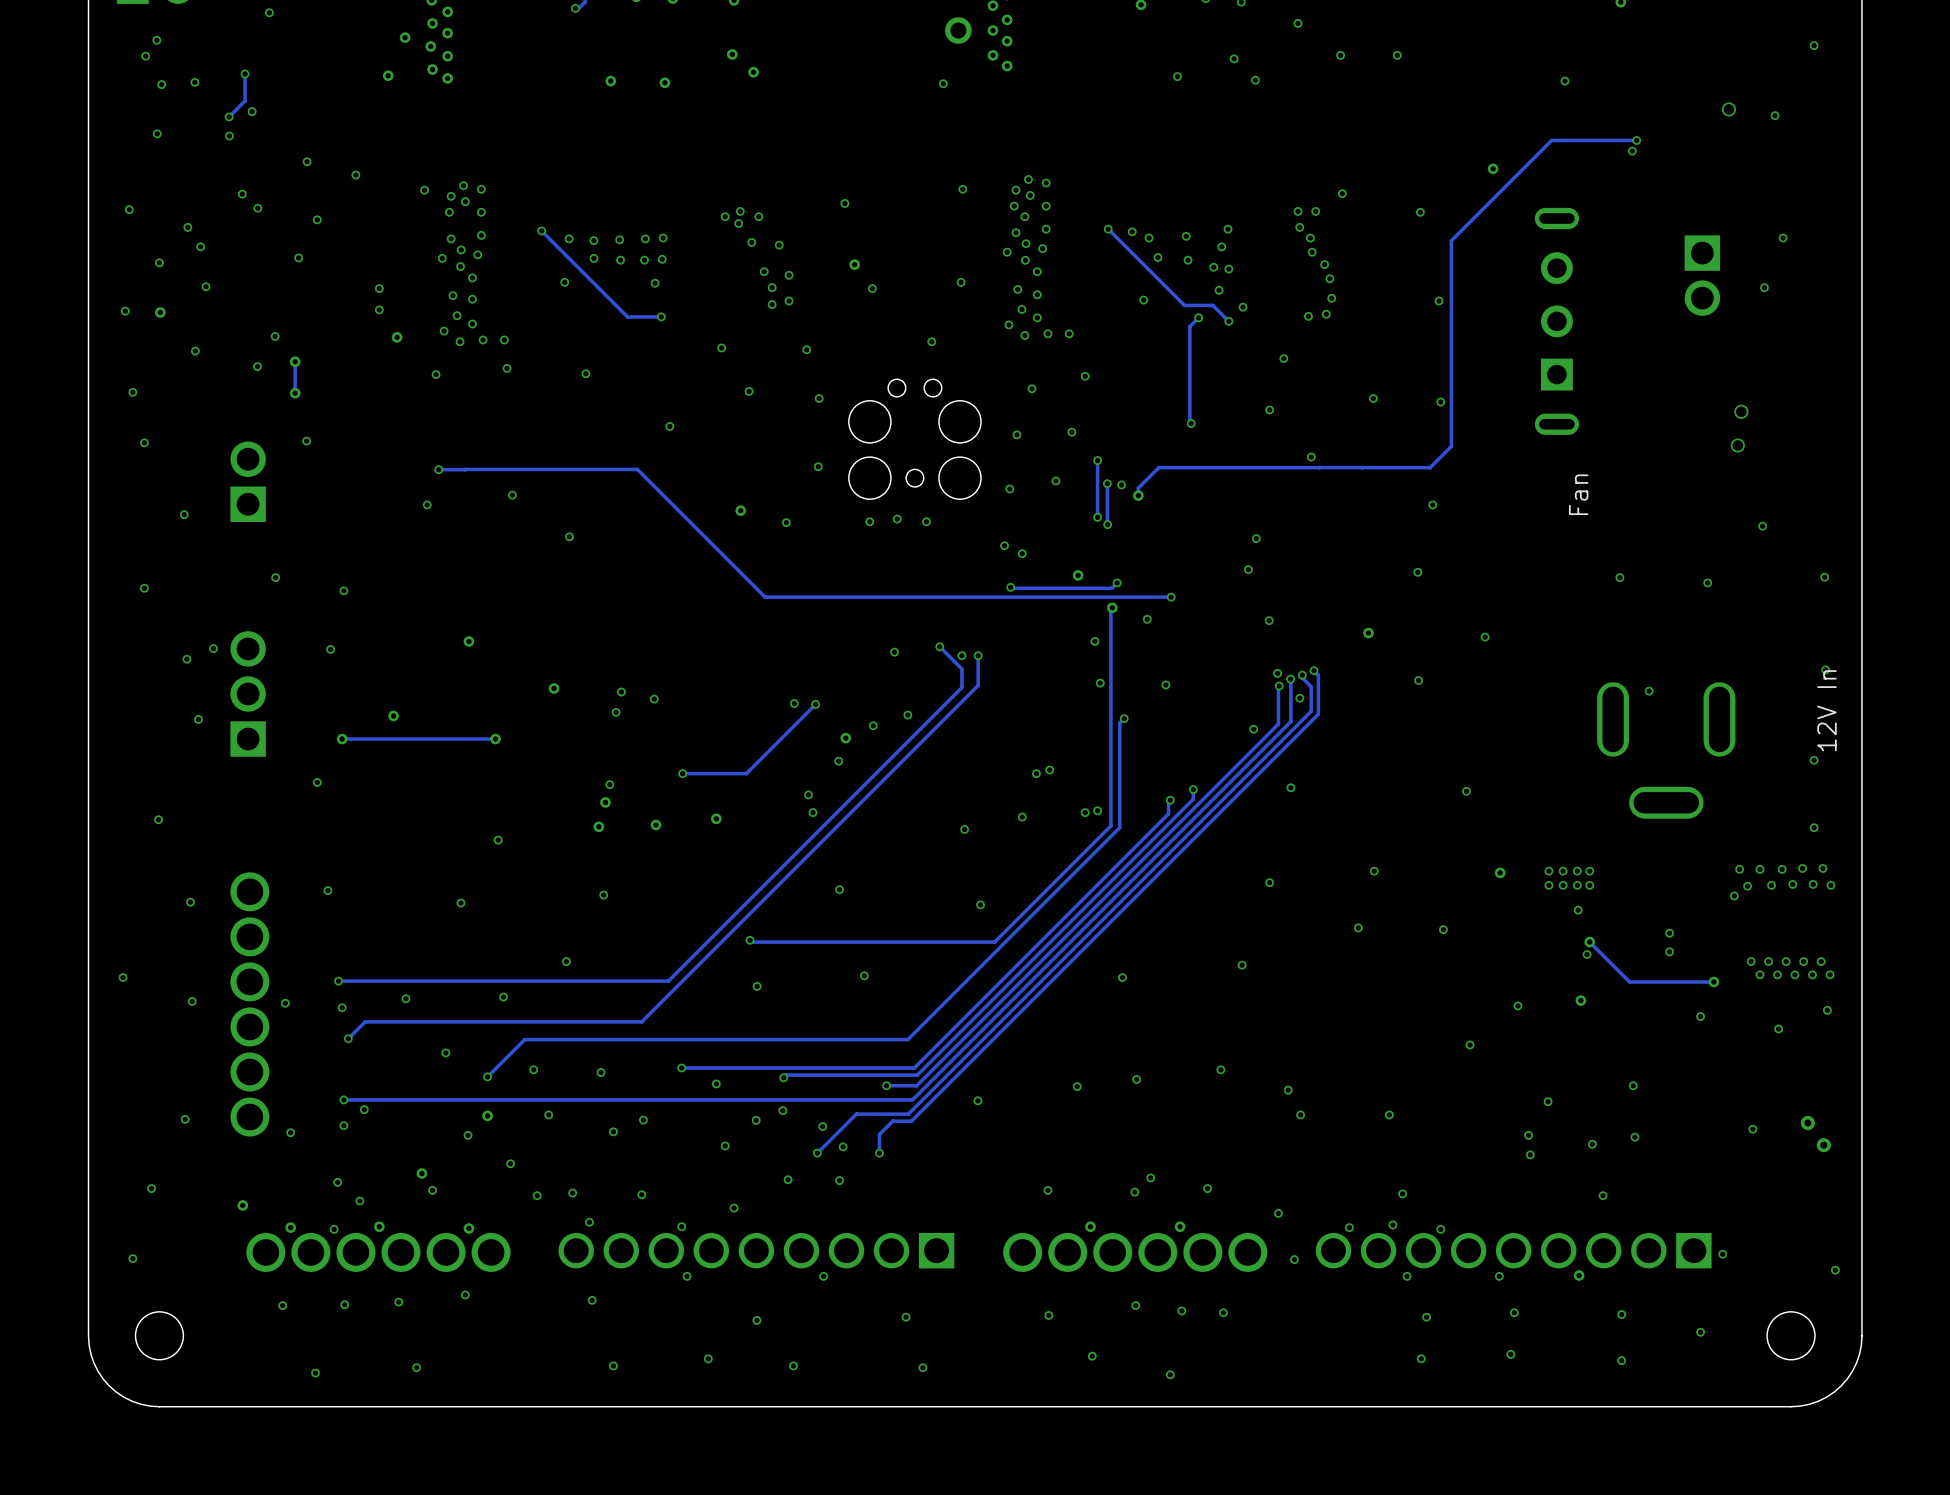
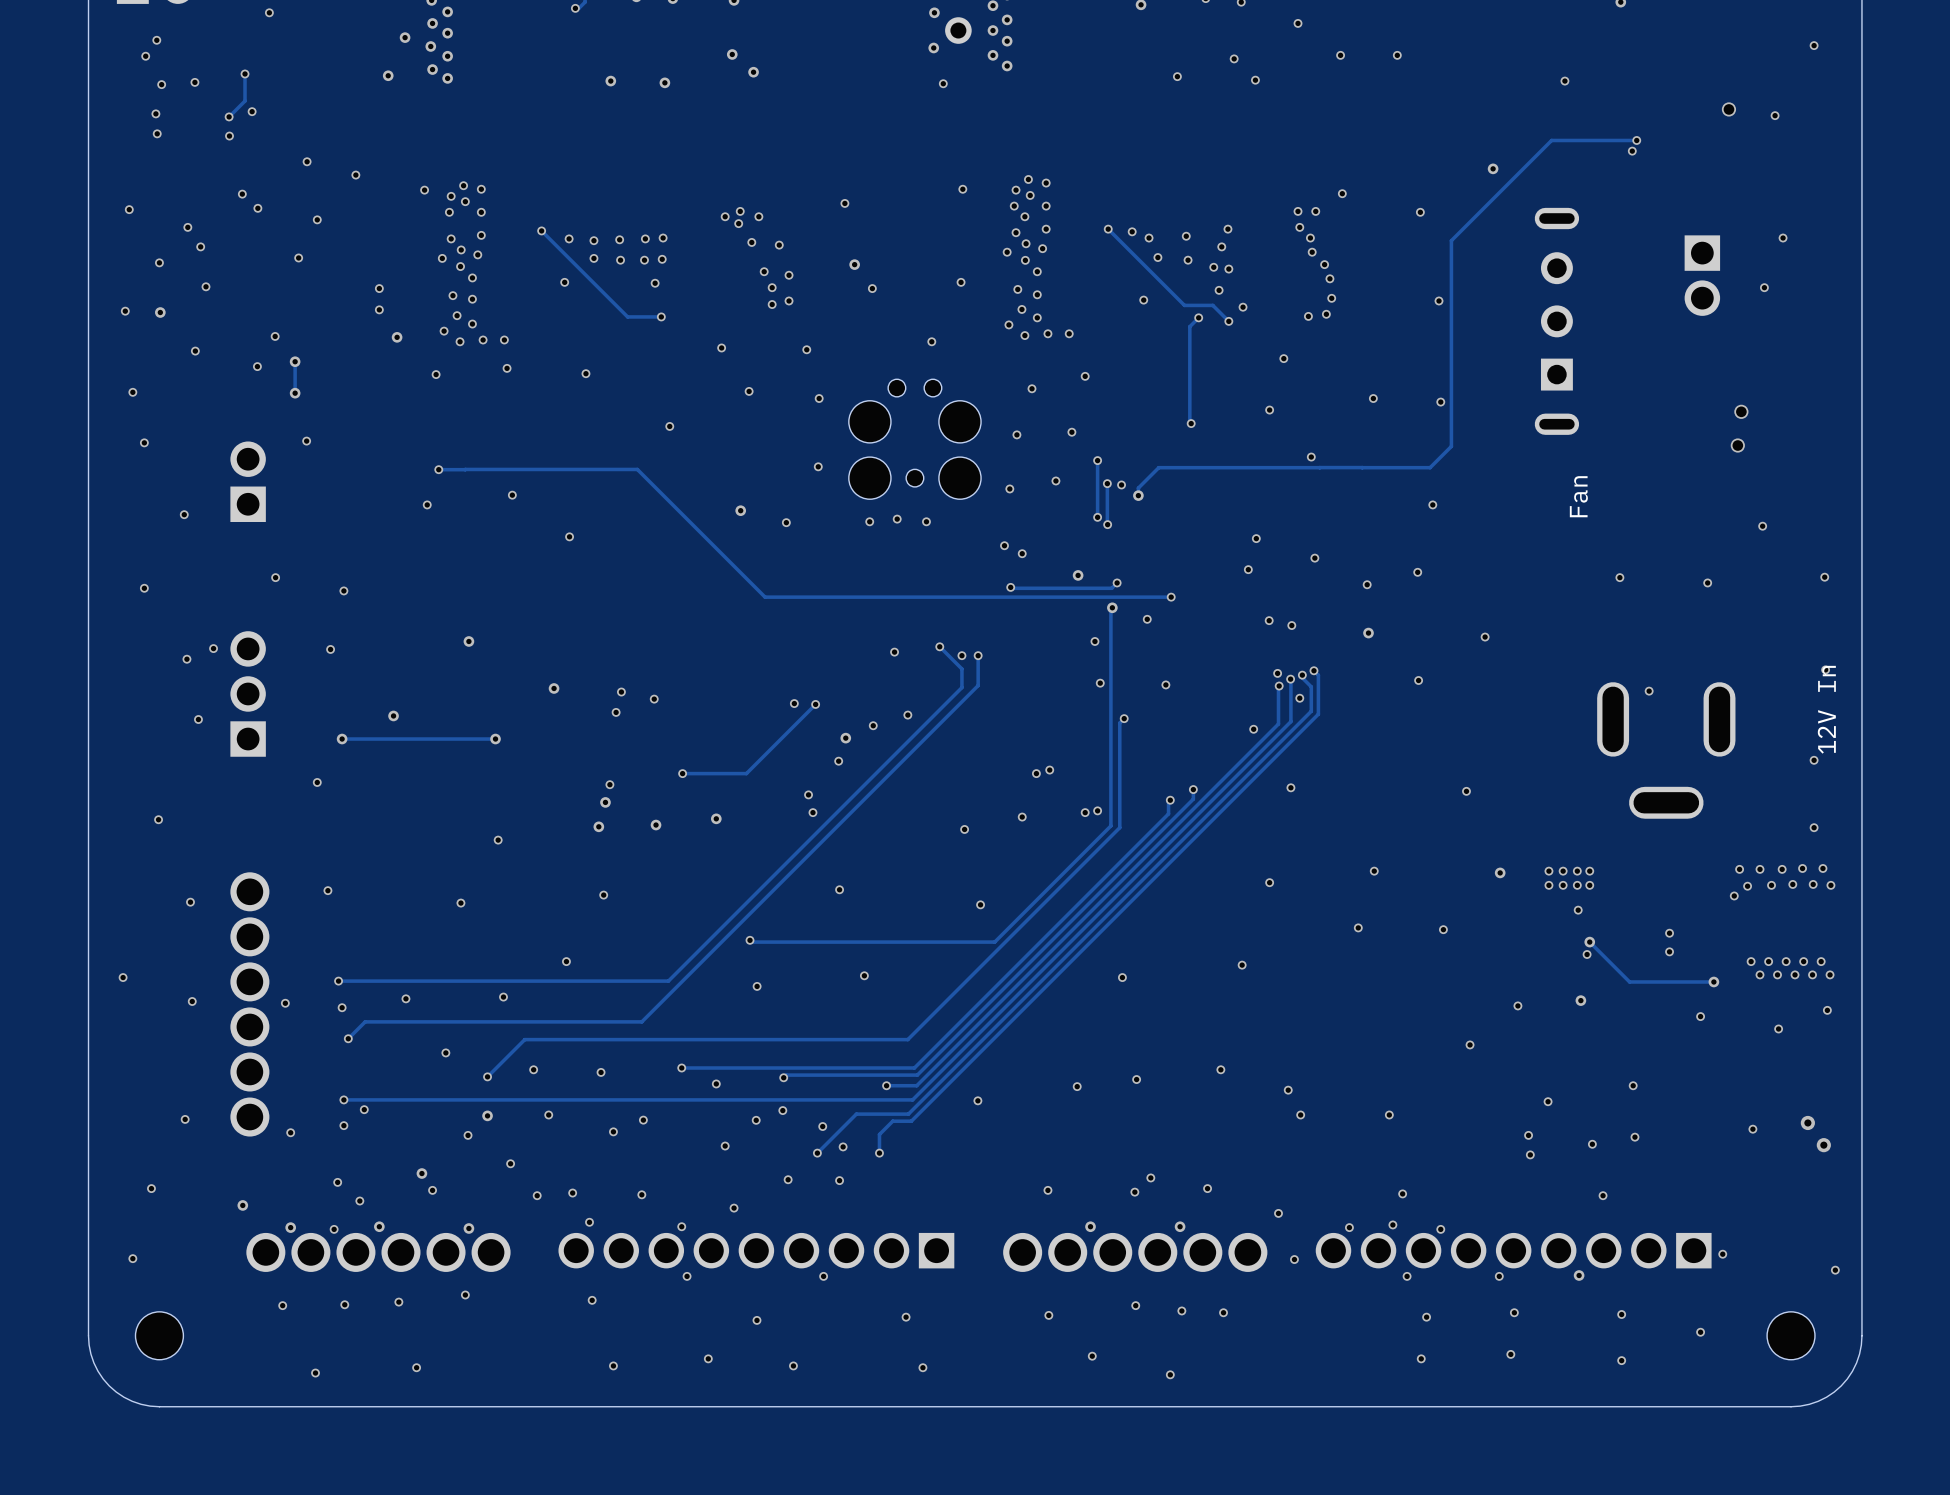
via: none -> (934, 12)
via: none -> (933, 47)
via: none -> (155, 113)
via: none -> (1314, 558)
via: none -> (1367, 584)
via: none -> (1291, 625)

